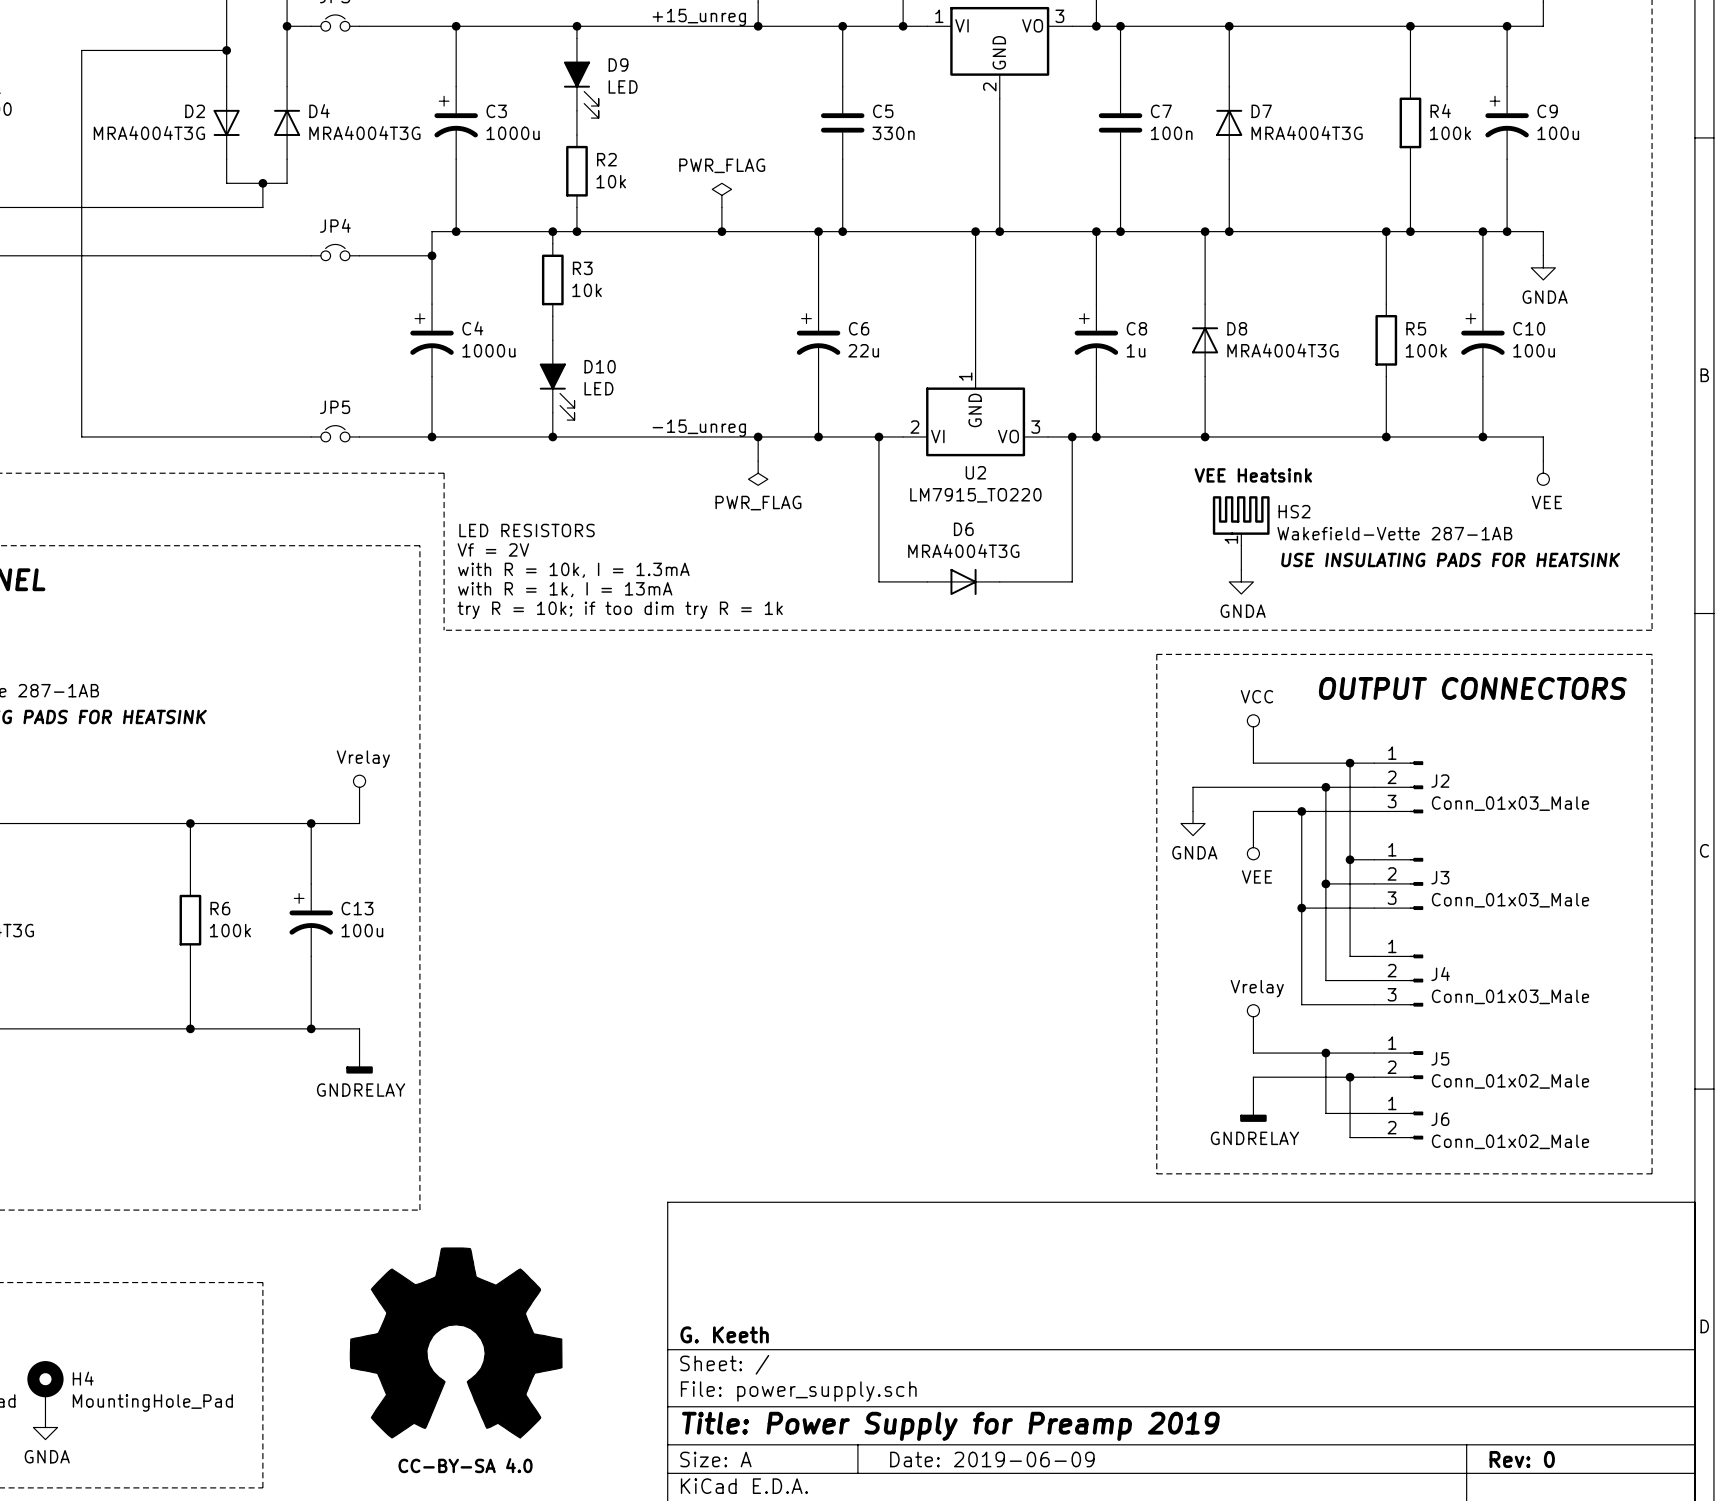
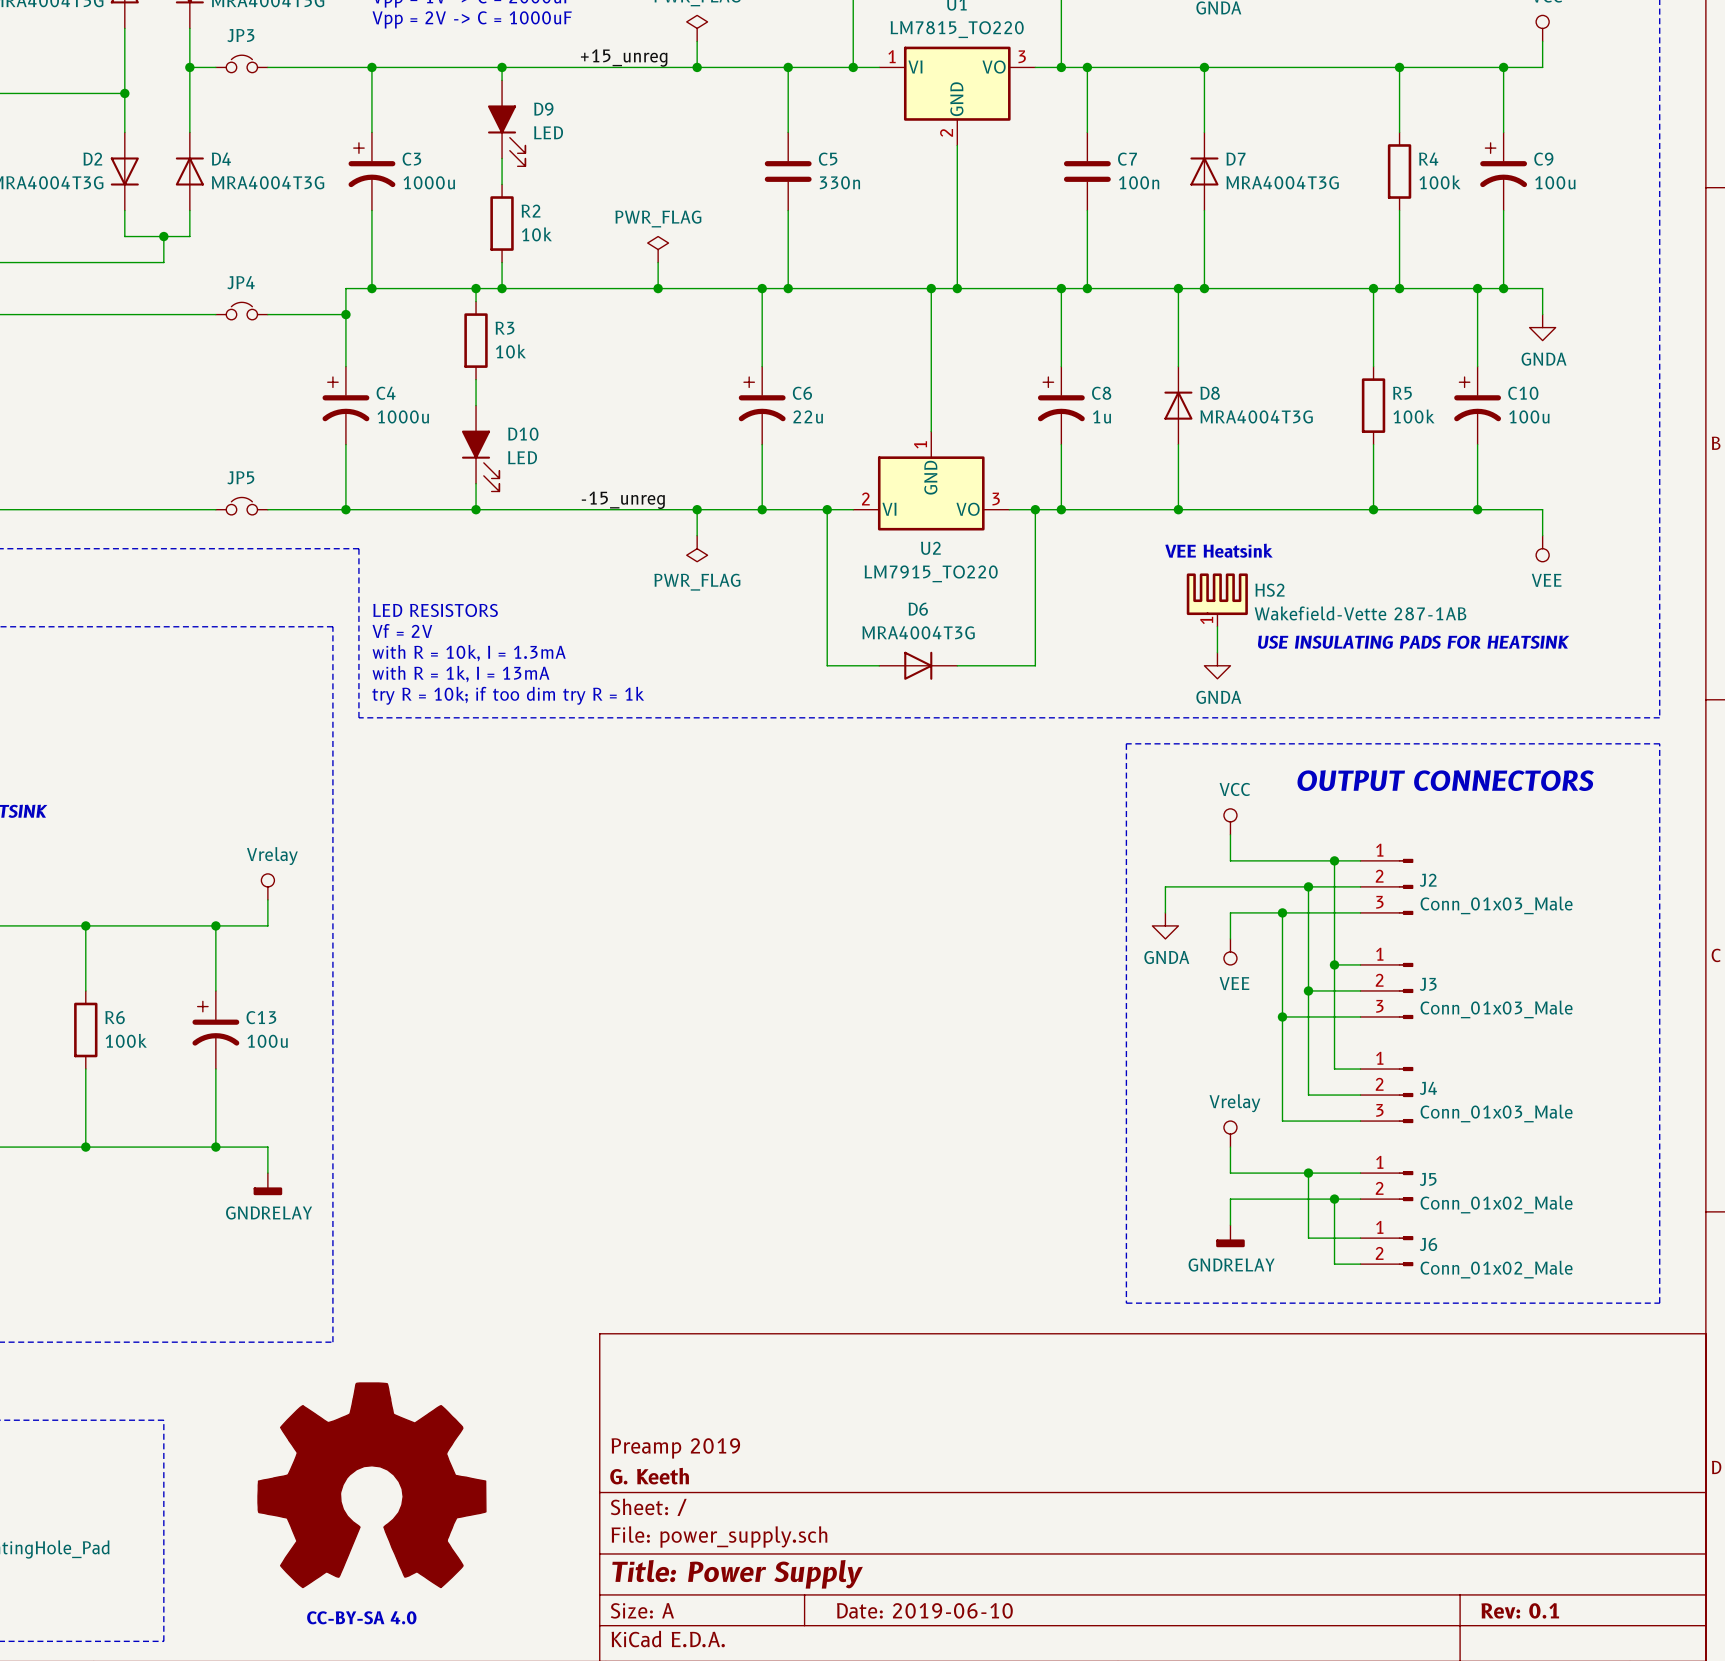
title block: none -> Preamp 2019 (675, 1448)
title block: Title: Power Supply for Preamp 2019 (950, 1426) -> Title: Power Supply (737, 1574)
title block: Date: 2019-06-09 (992, 1459) -> Date: 2019-06-10 (924, 1610)
title block: Rev: 0 (1522, 1459) -> Rev: 0.1 (1520, 1610)

